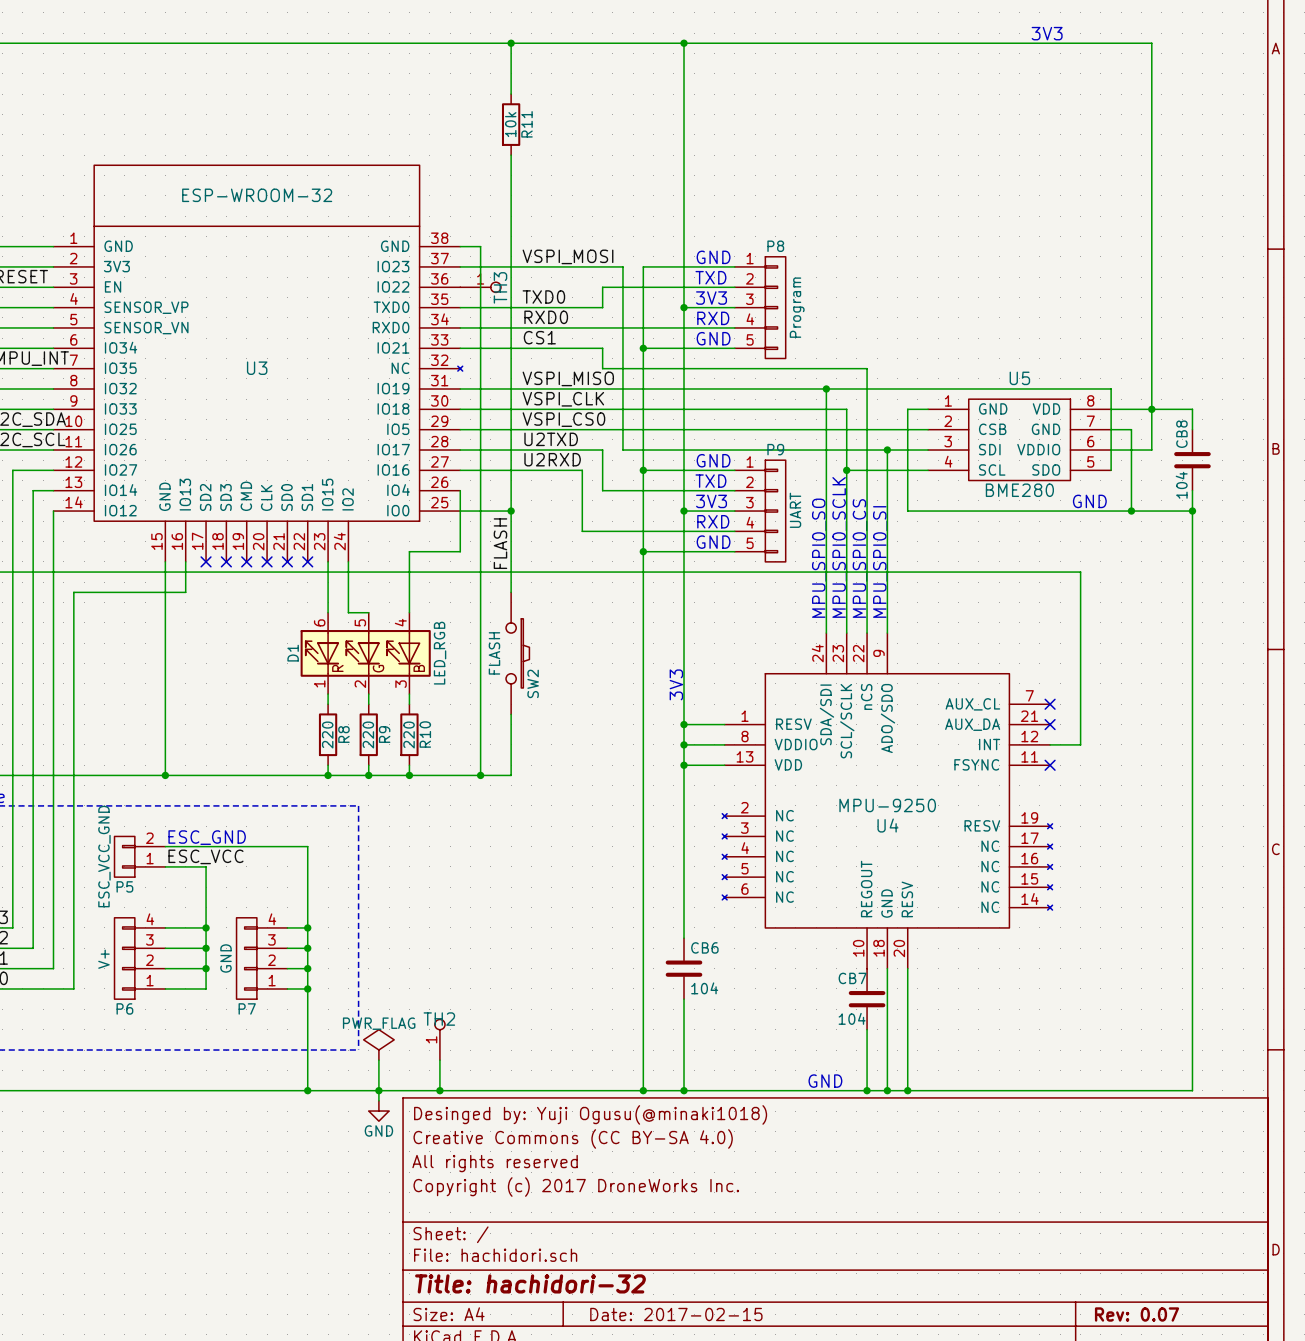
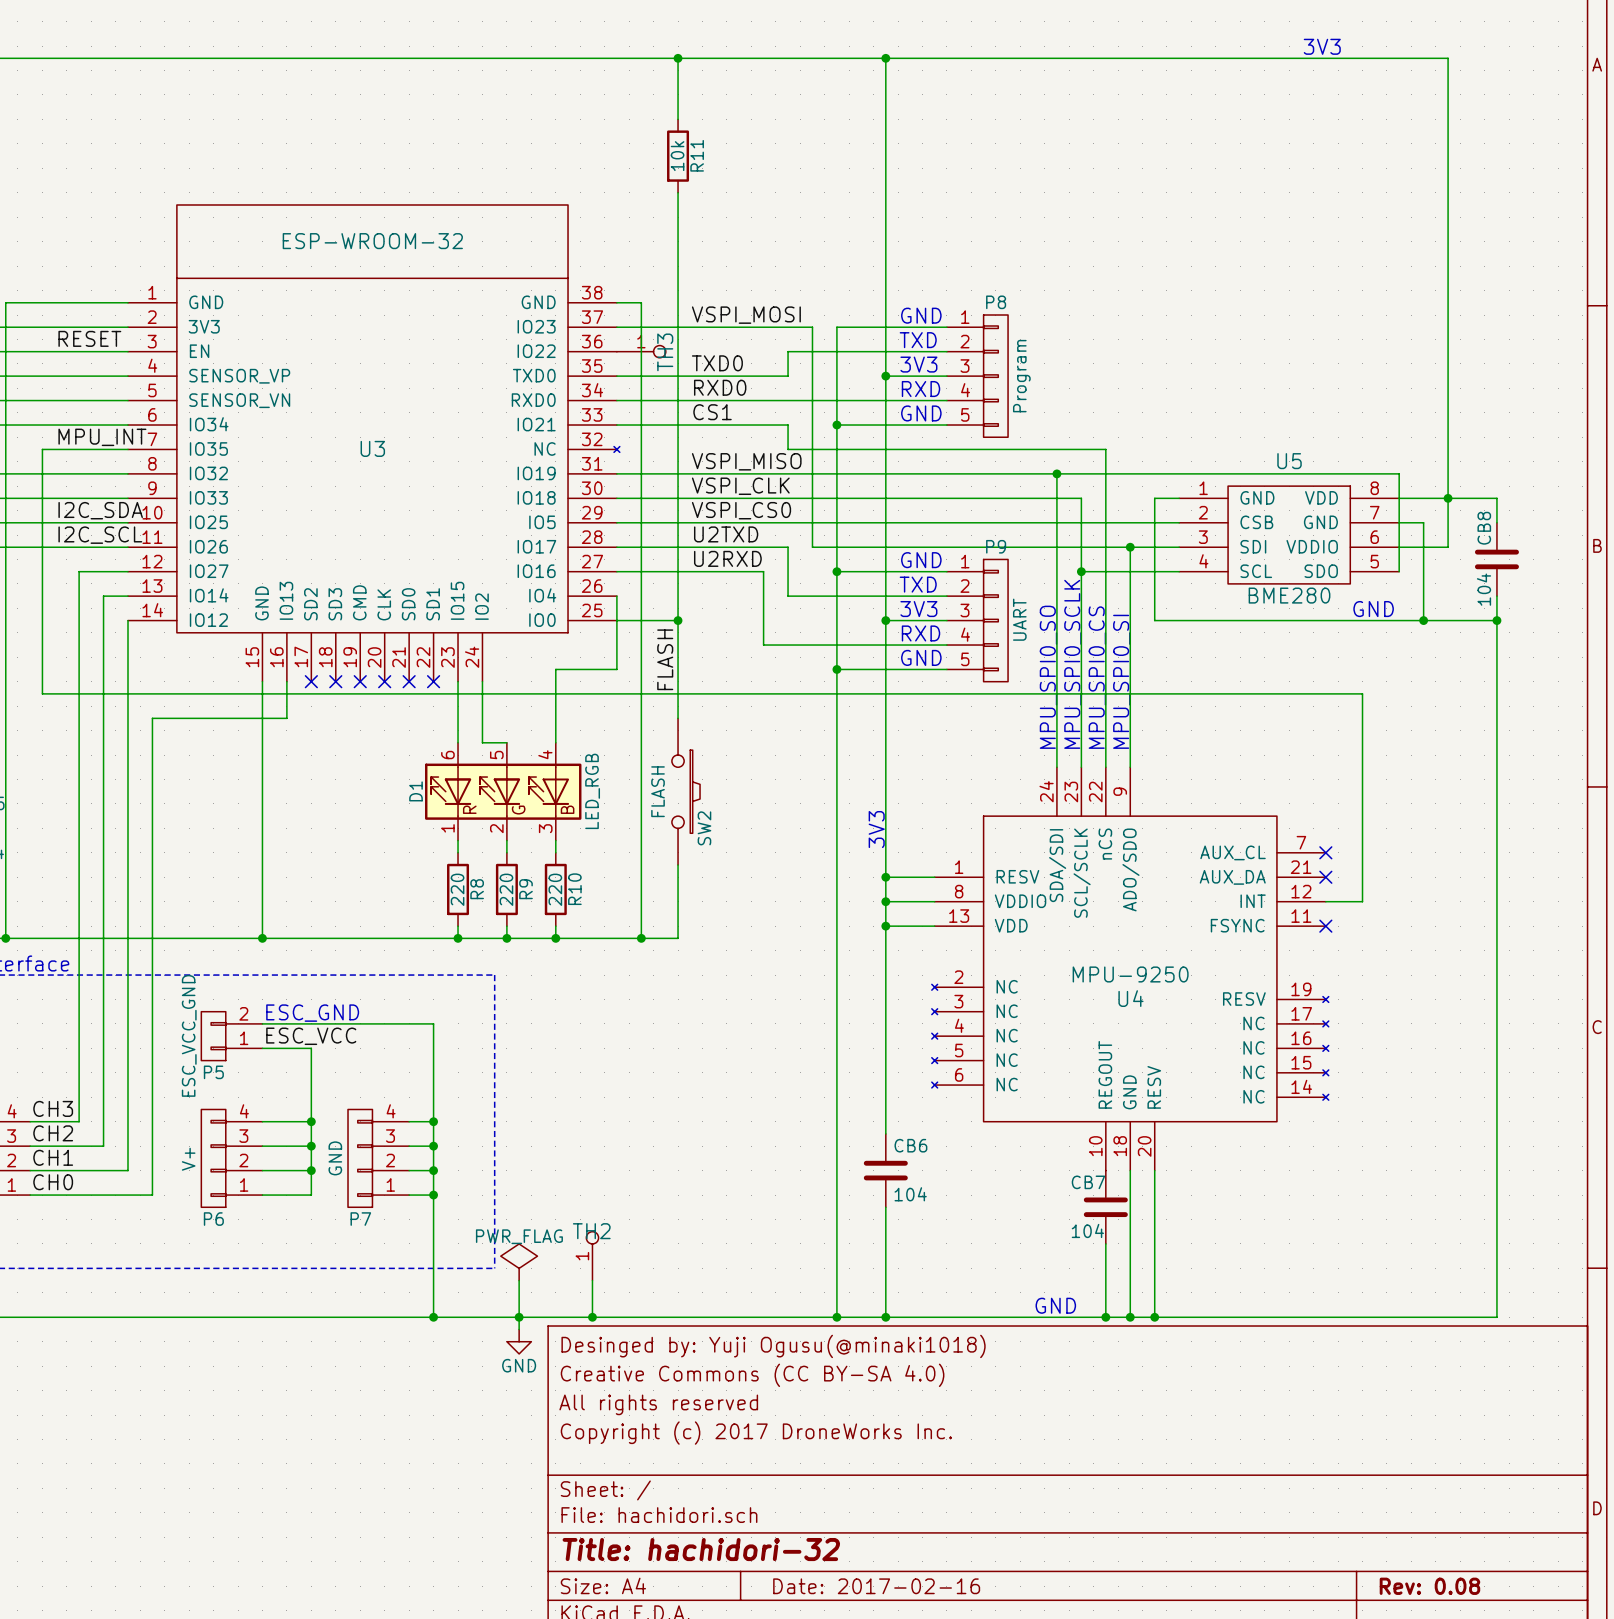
title block: Date: 2017-02-15 (676, 1314) -> Date: 2017-02-16 (876, 1586)
title block: Rev: 0.07 (1137, 1314) -> Rev: 0.08 (1429, 1586)

